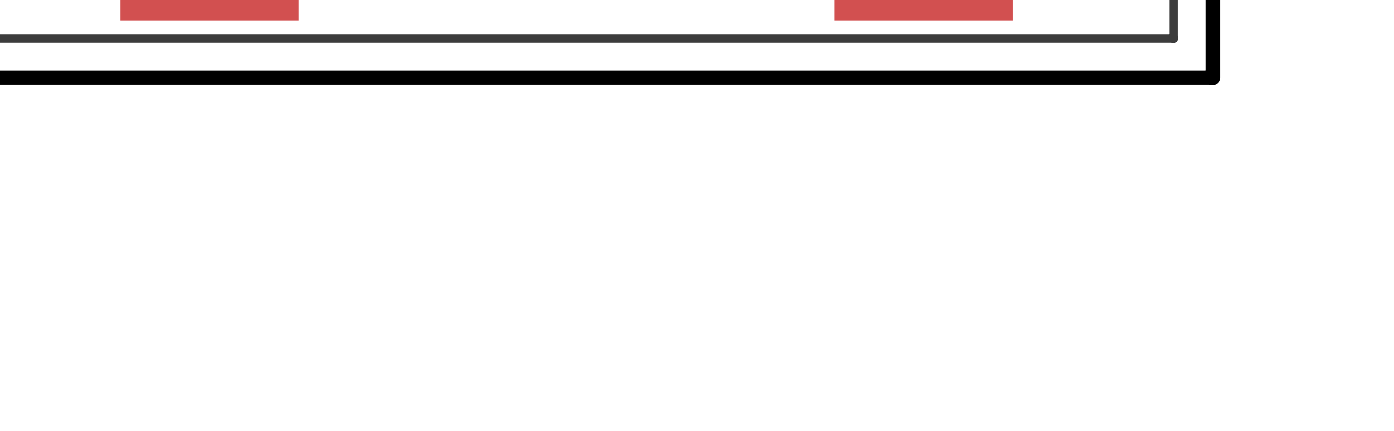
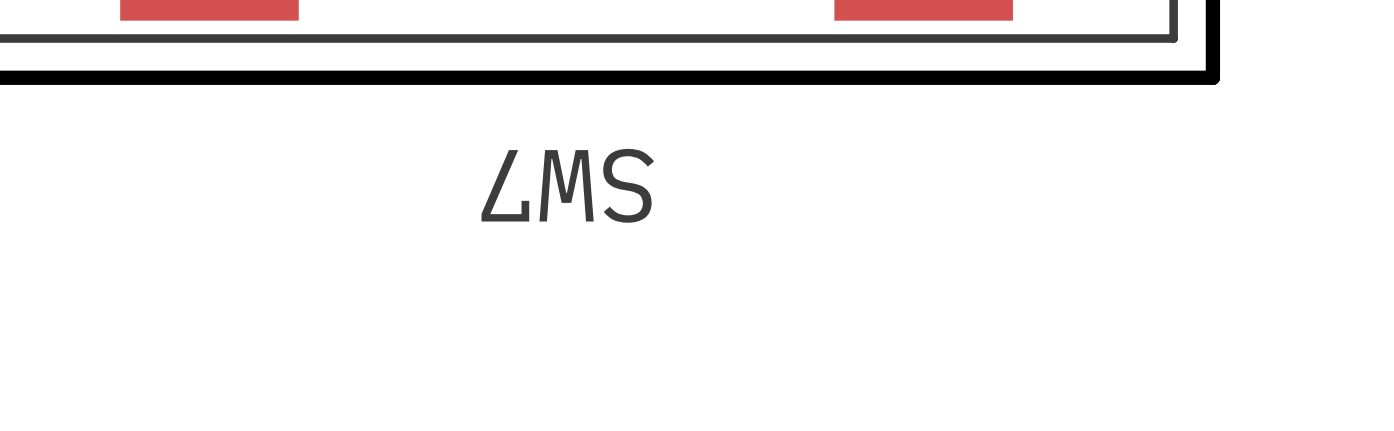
SW7 name: none -> SW7 (567, 185)

